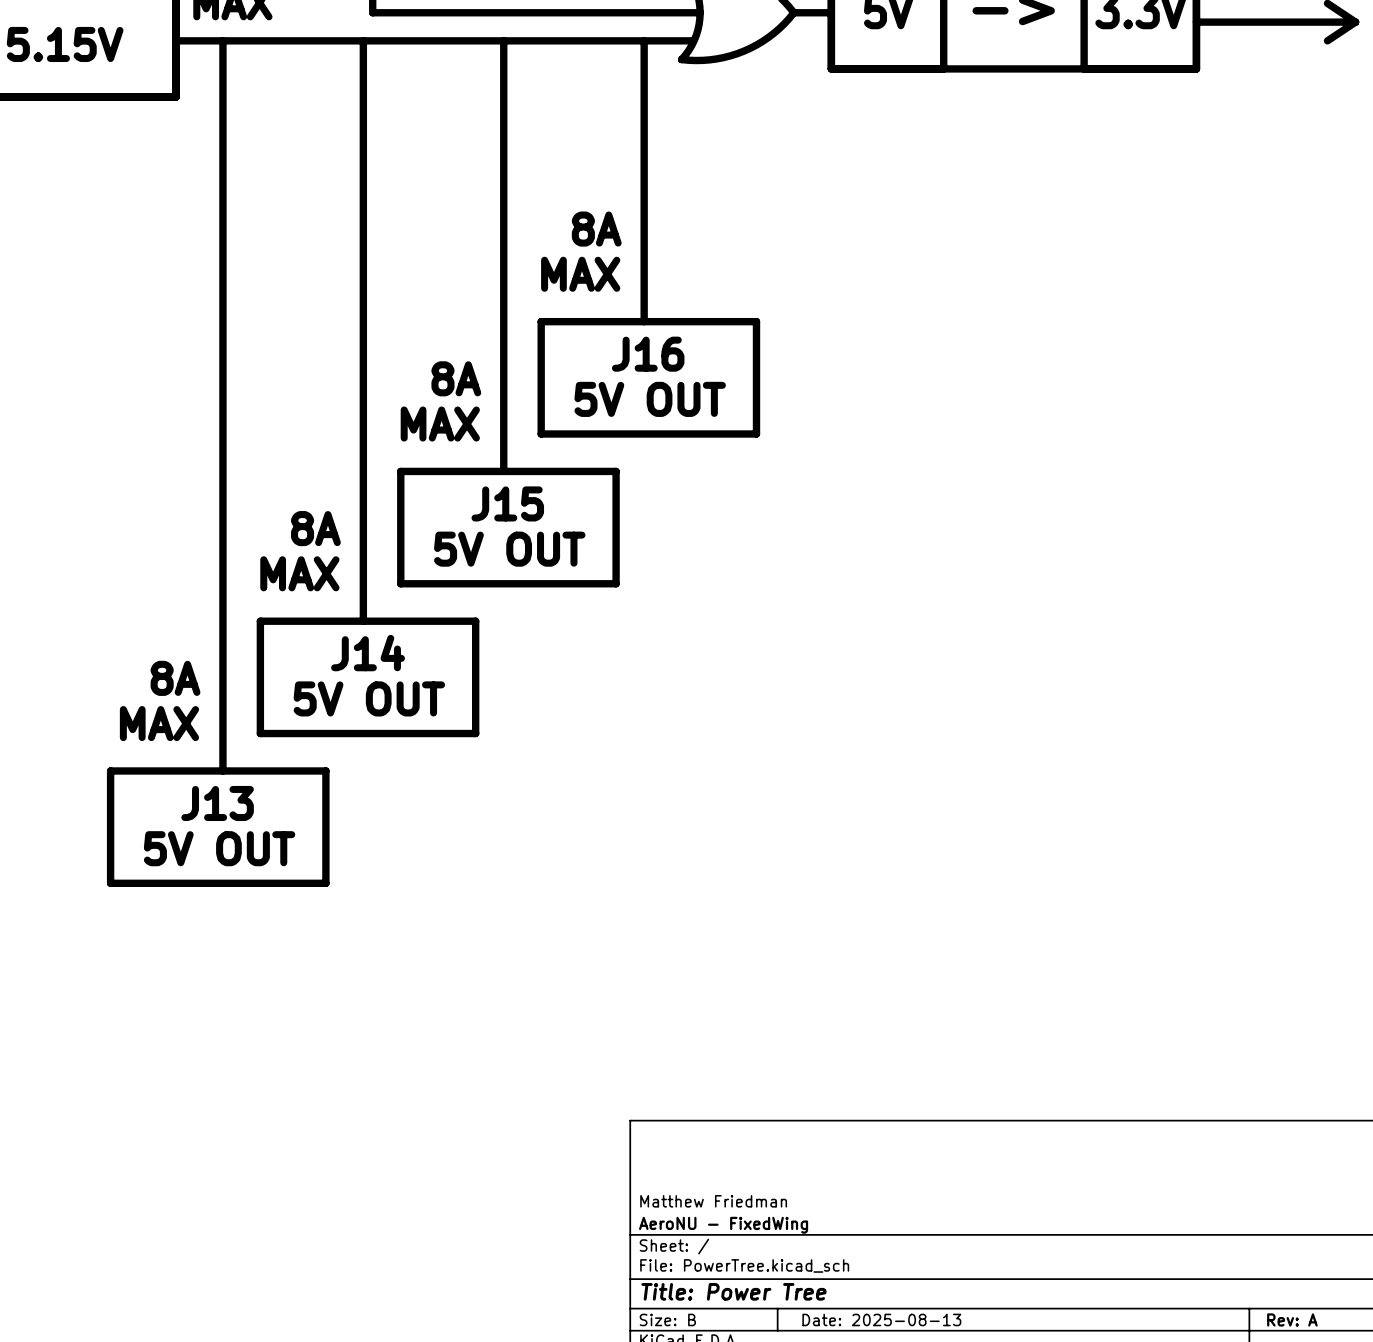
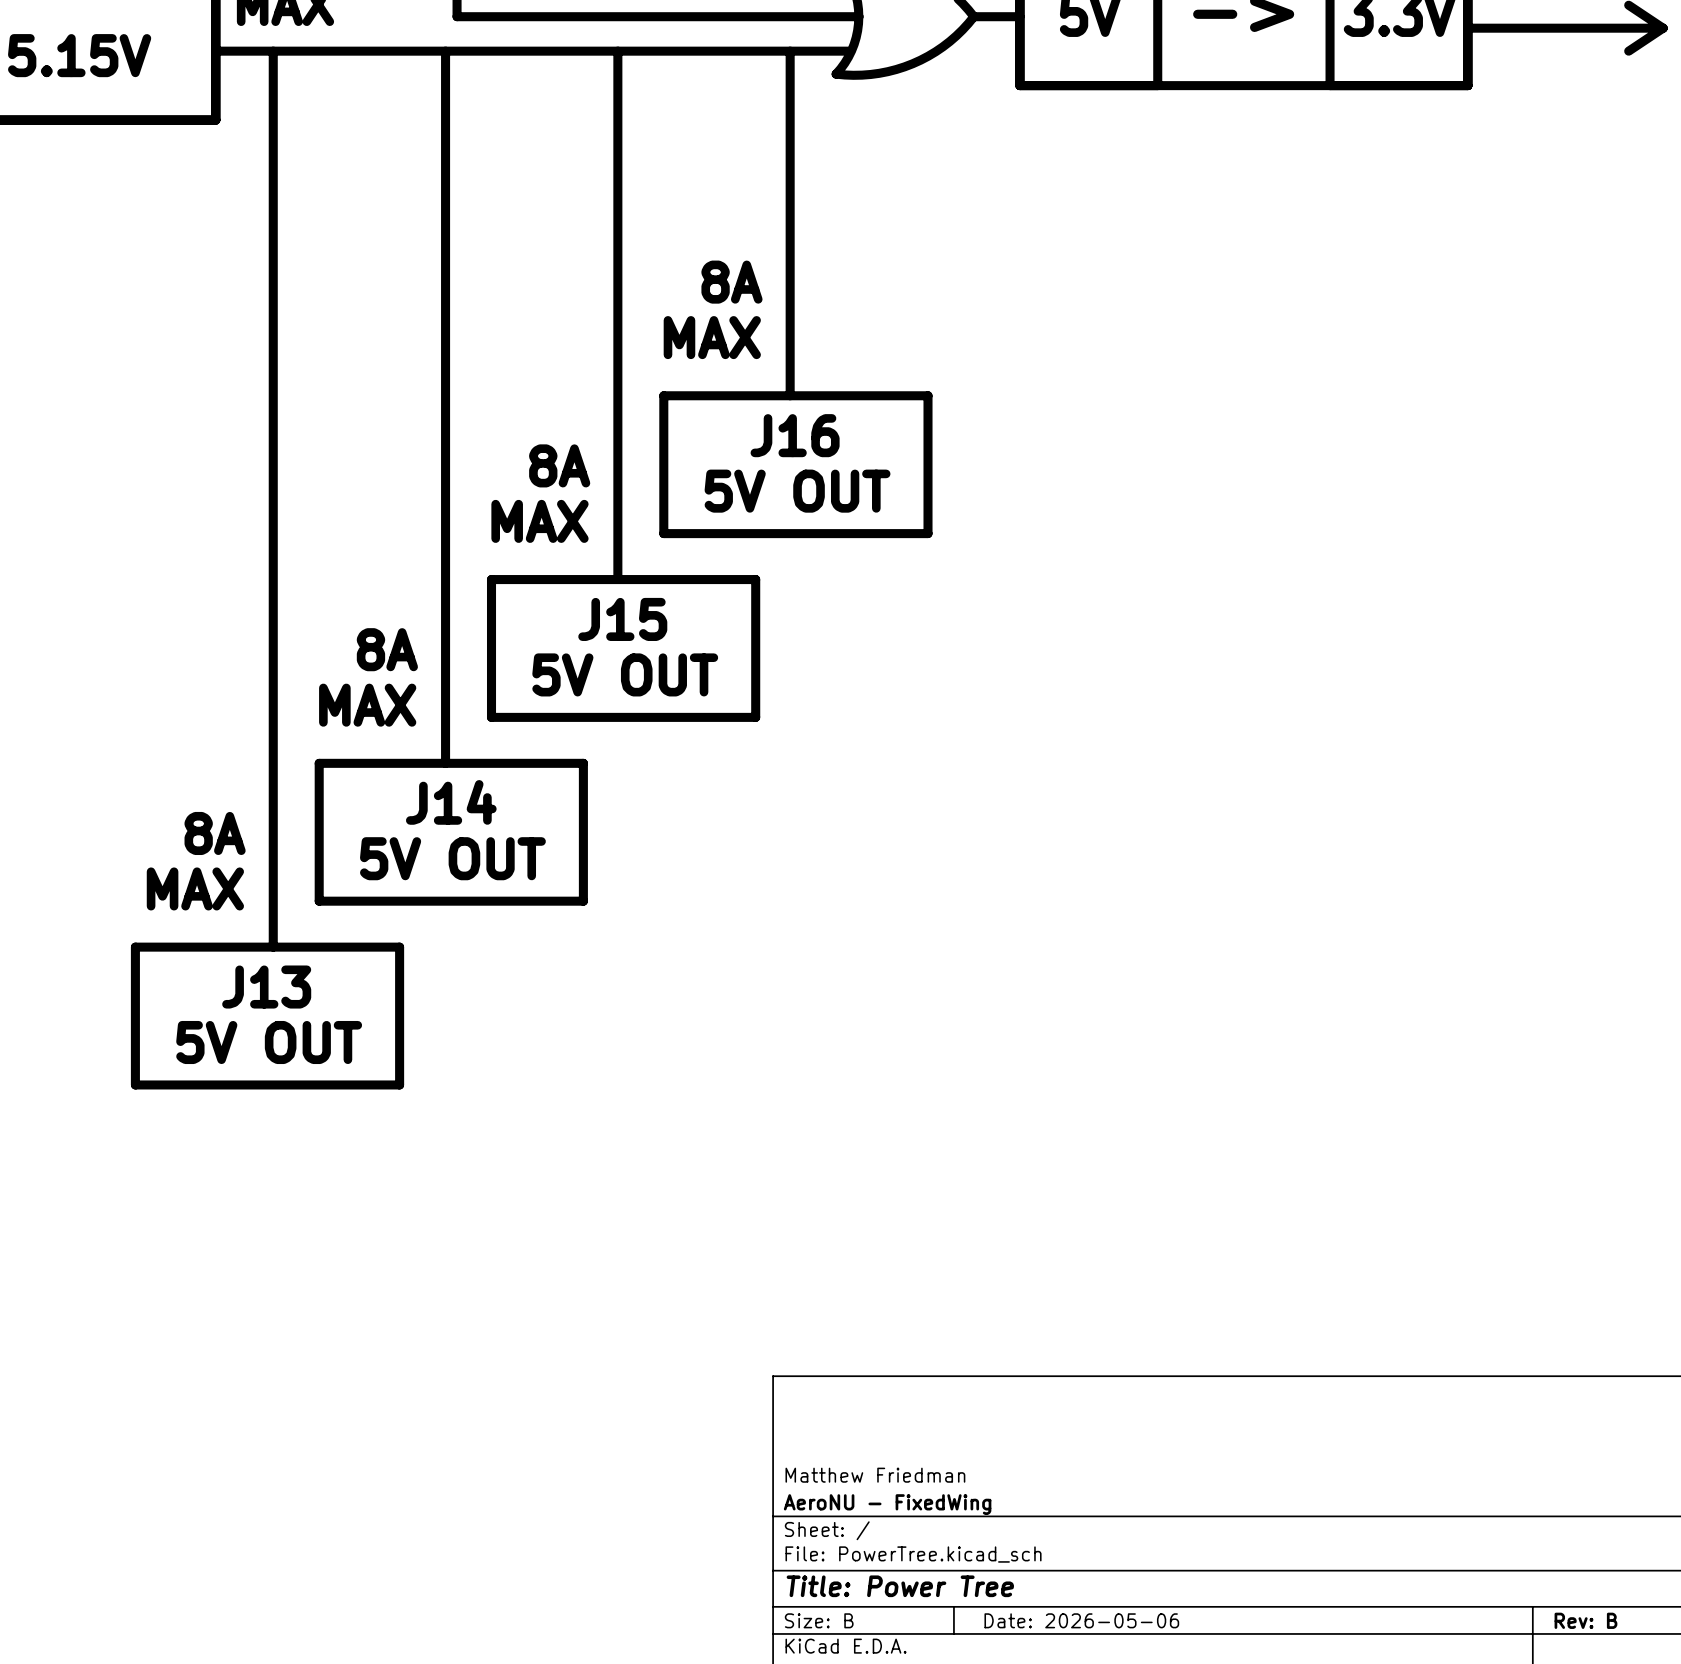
title block: Date: 2025-08-13 (881, 1319) -> Date: 2026-05-06 (1081, 1620)
title block: Rev: A (1292, 1319) -> Rev: B (1585, 1620)

